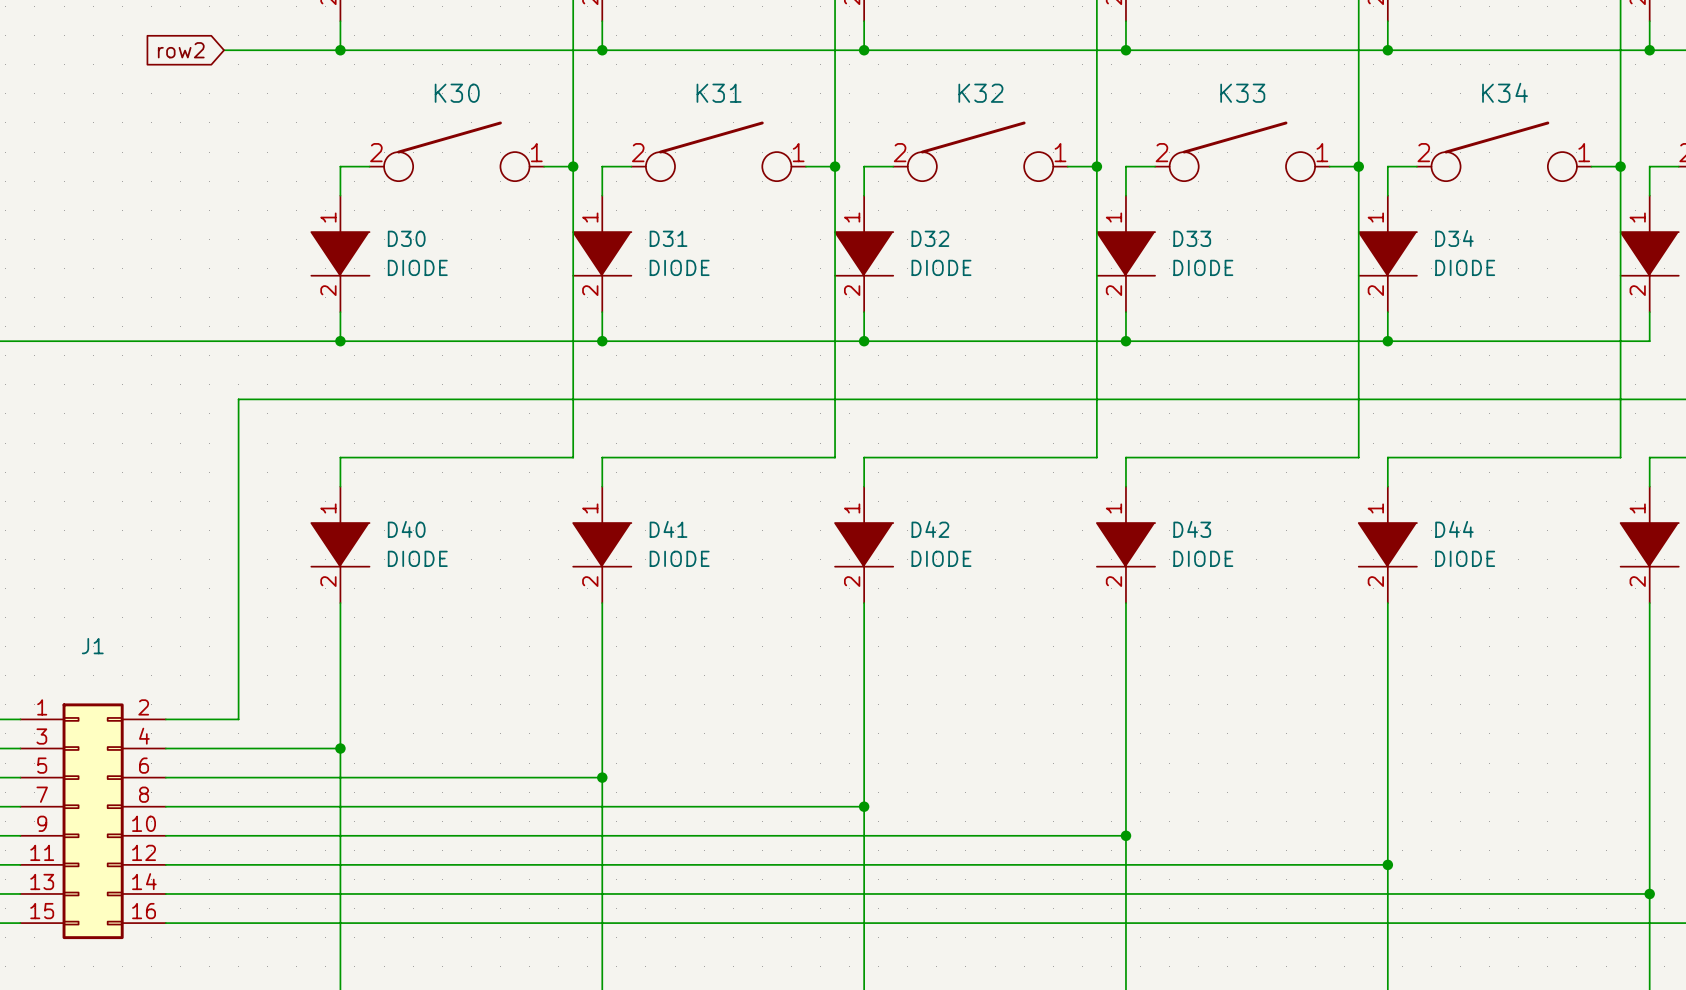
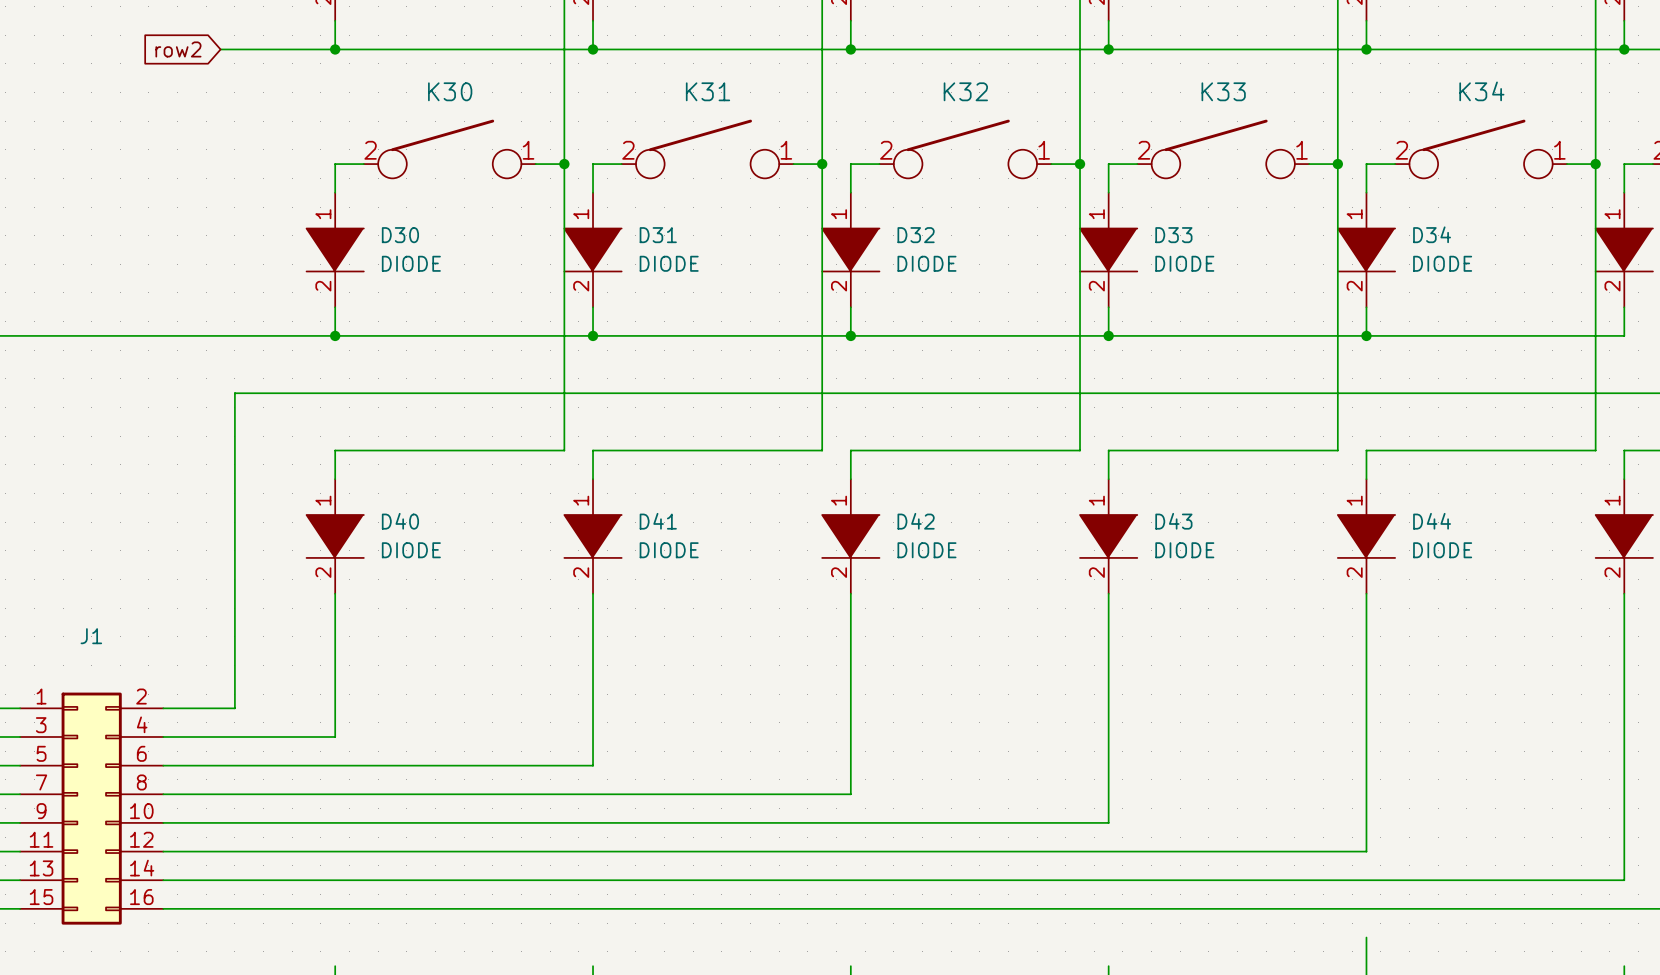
wire: (340, 748) (340, 981) -> none
junction: (340, 748) -> none
wire: (602, 777) (602, 981) -> none
junction: (602, 777) -> none
wire: (864, 806) (864, 981) -> none
junction: (864, 806) -> none
wire: (1125, 835) (1125, 981) -> none
junction: (1125, 835) -> none
wire: (1387, 864) (1387, 952) -> none
junction: (1387, 864) -> none
wire: (1649, 893) (1649, 981) -> none
junction: (1649, 893) -> none

